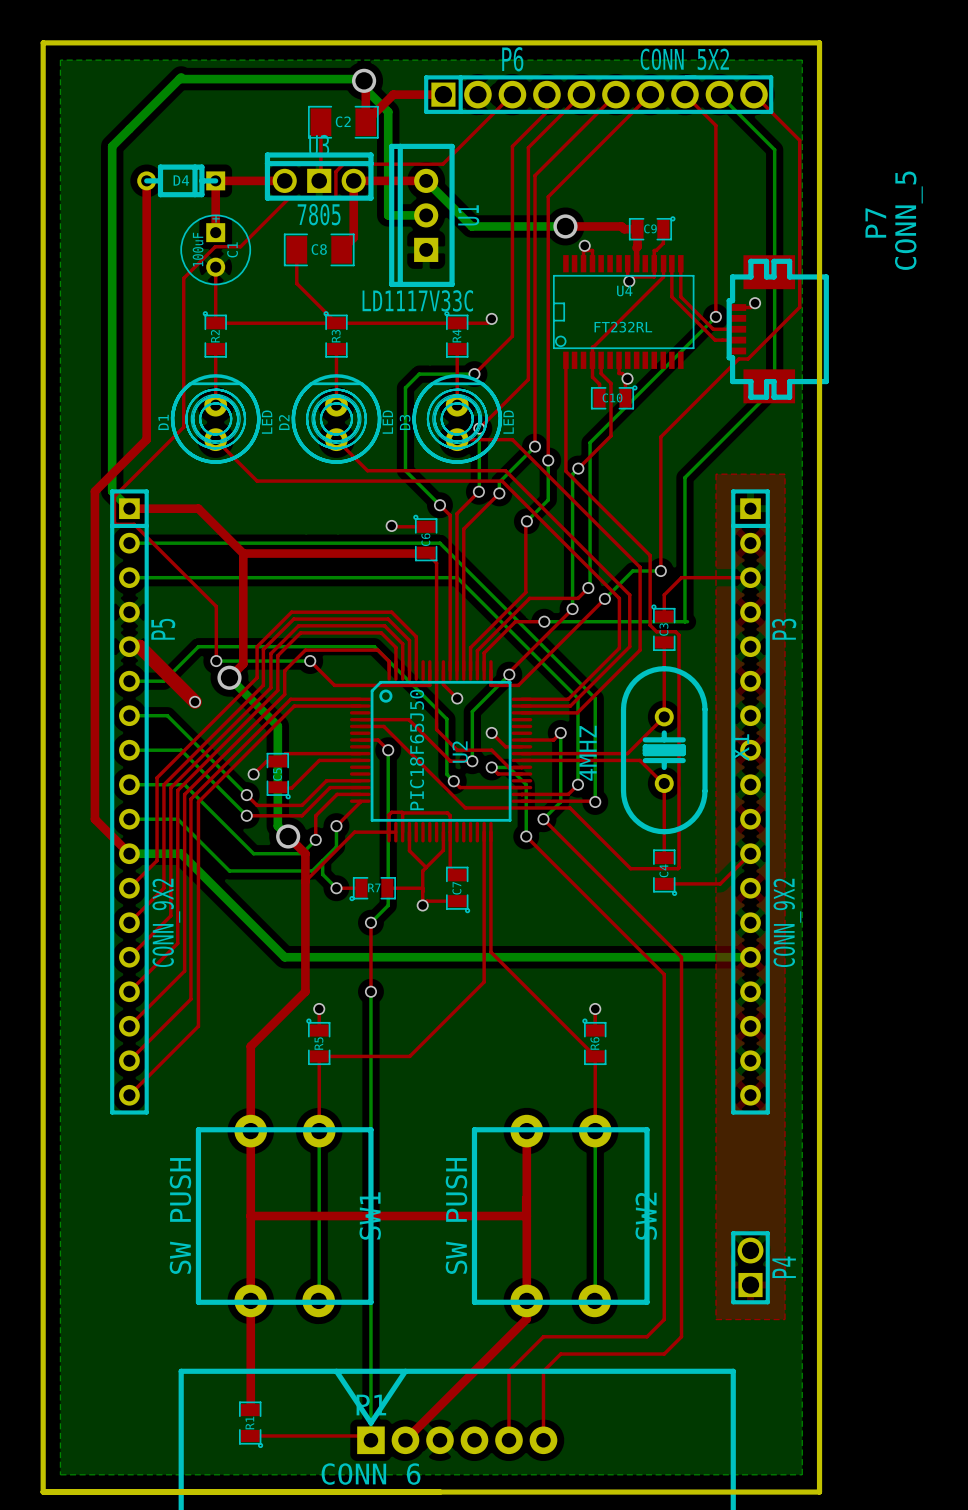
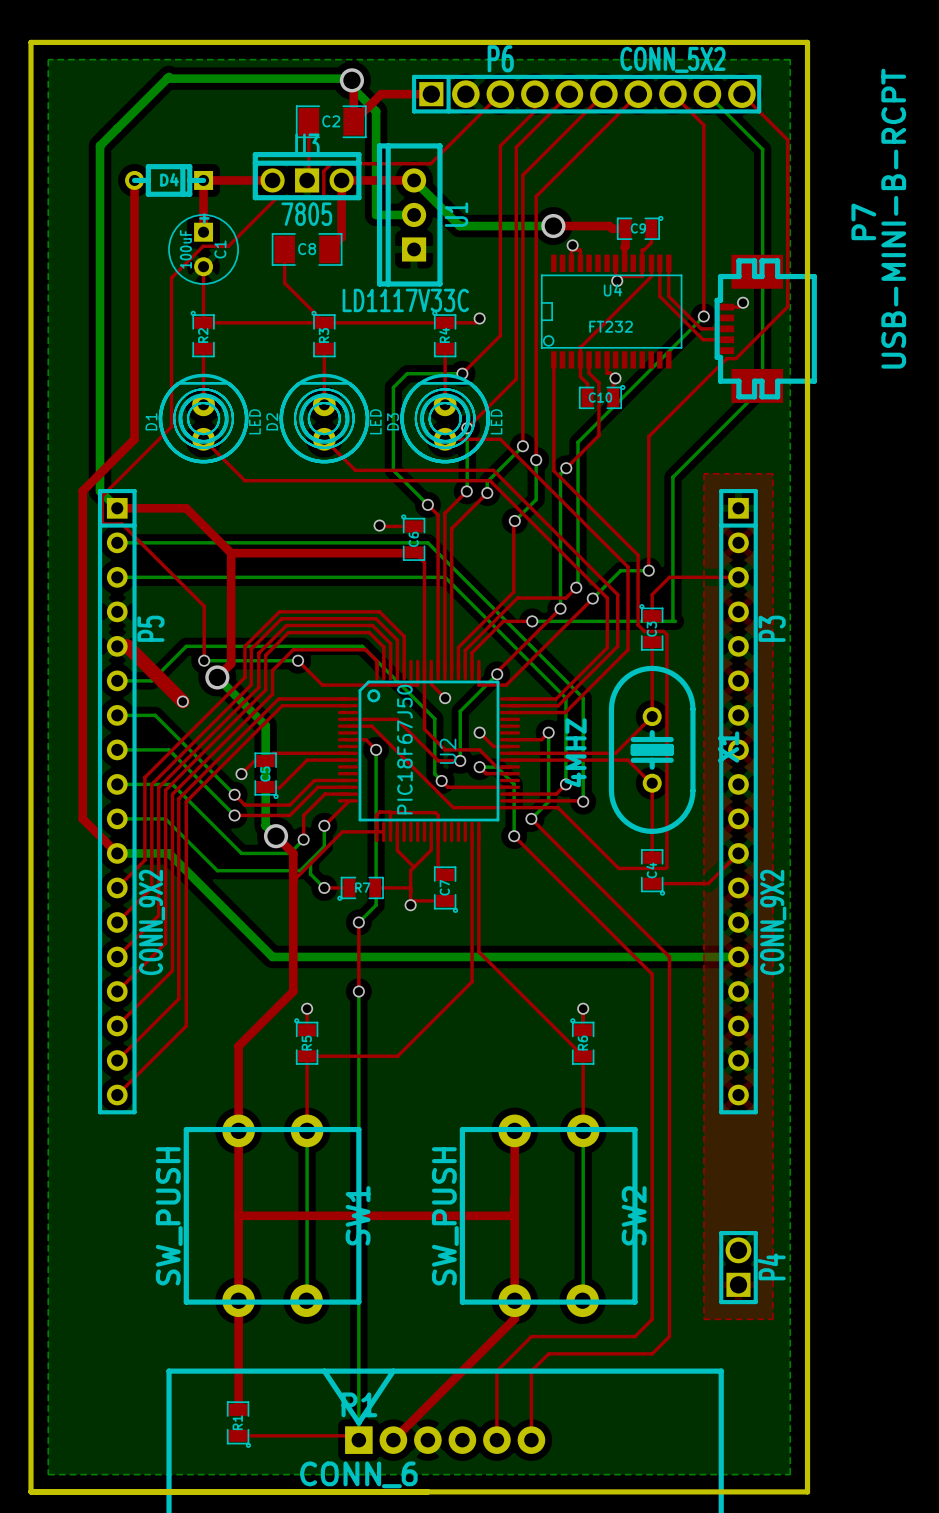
P7 value: CONN_5 (908, 220) -> USB-MINI-B-RCPT (893, 218)
U4 value: FT232RL (623, 327) -> FT232 (611, 326)
U2 value: PIC18F65J50 (417, 749) -> PIC18F67J50 (404, 749)

